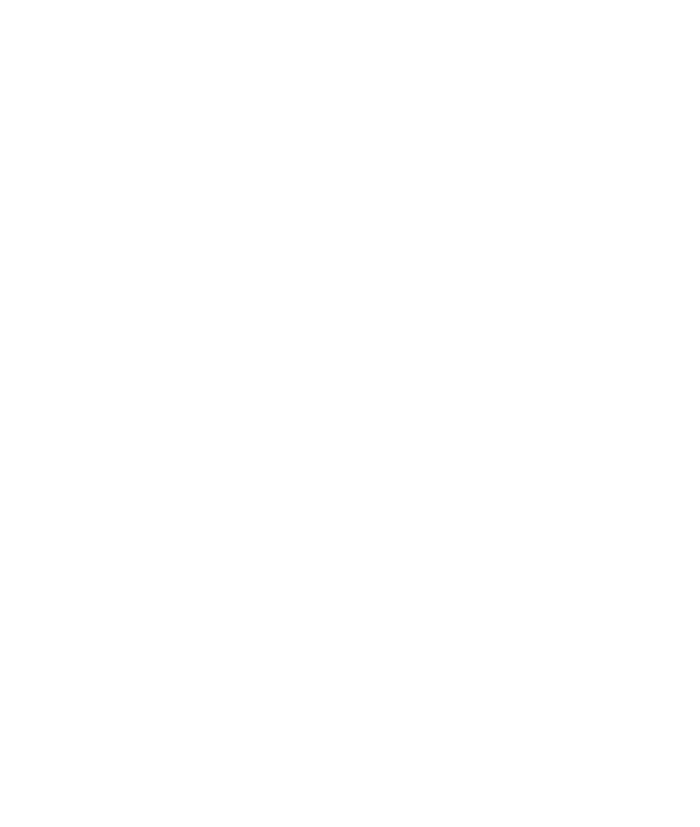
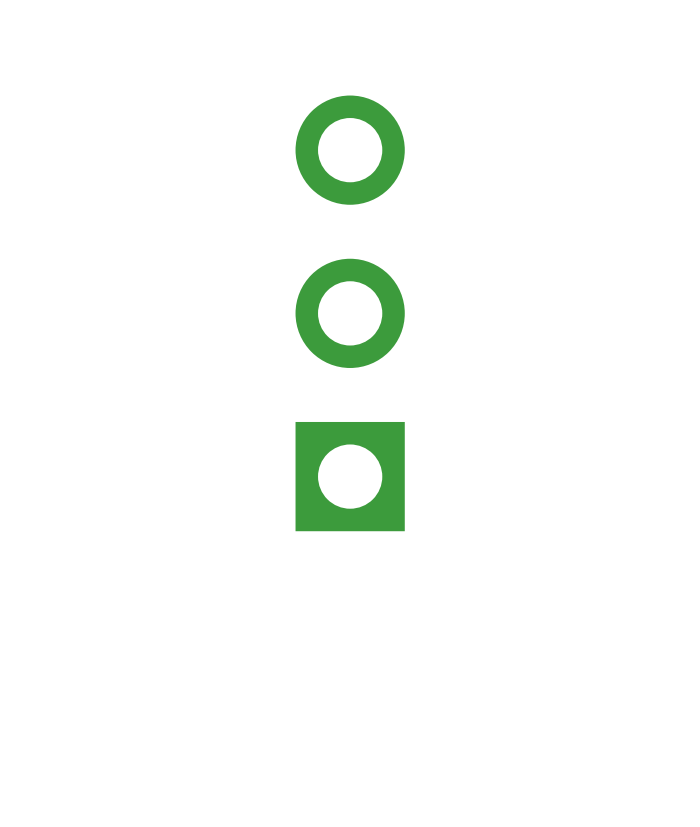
part: none -> (350, 313)

